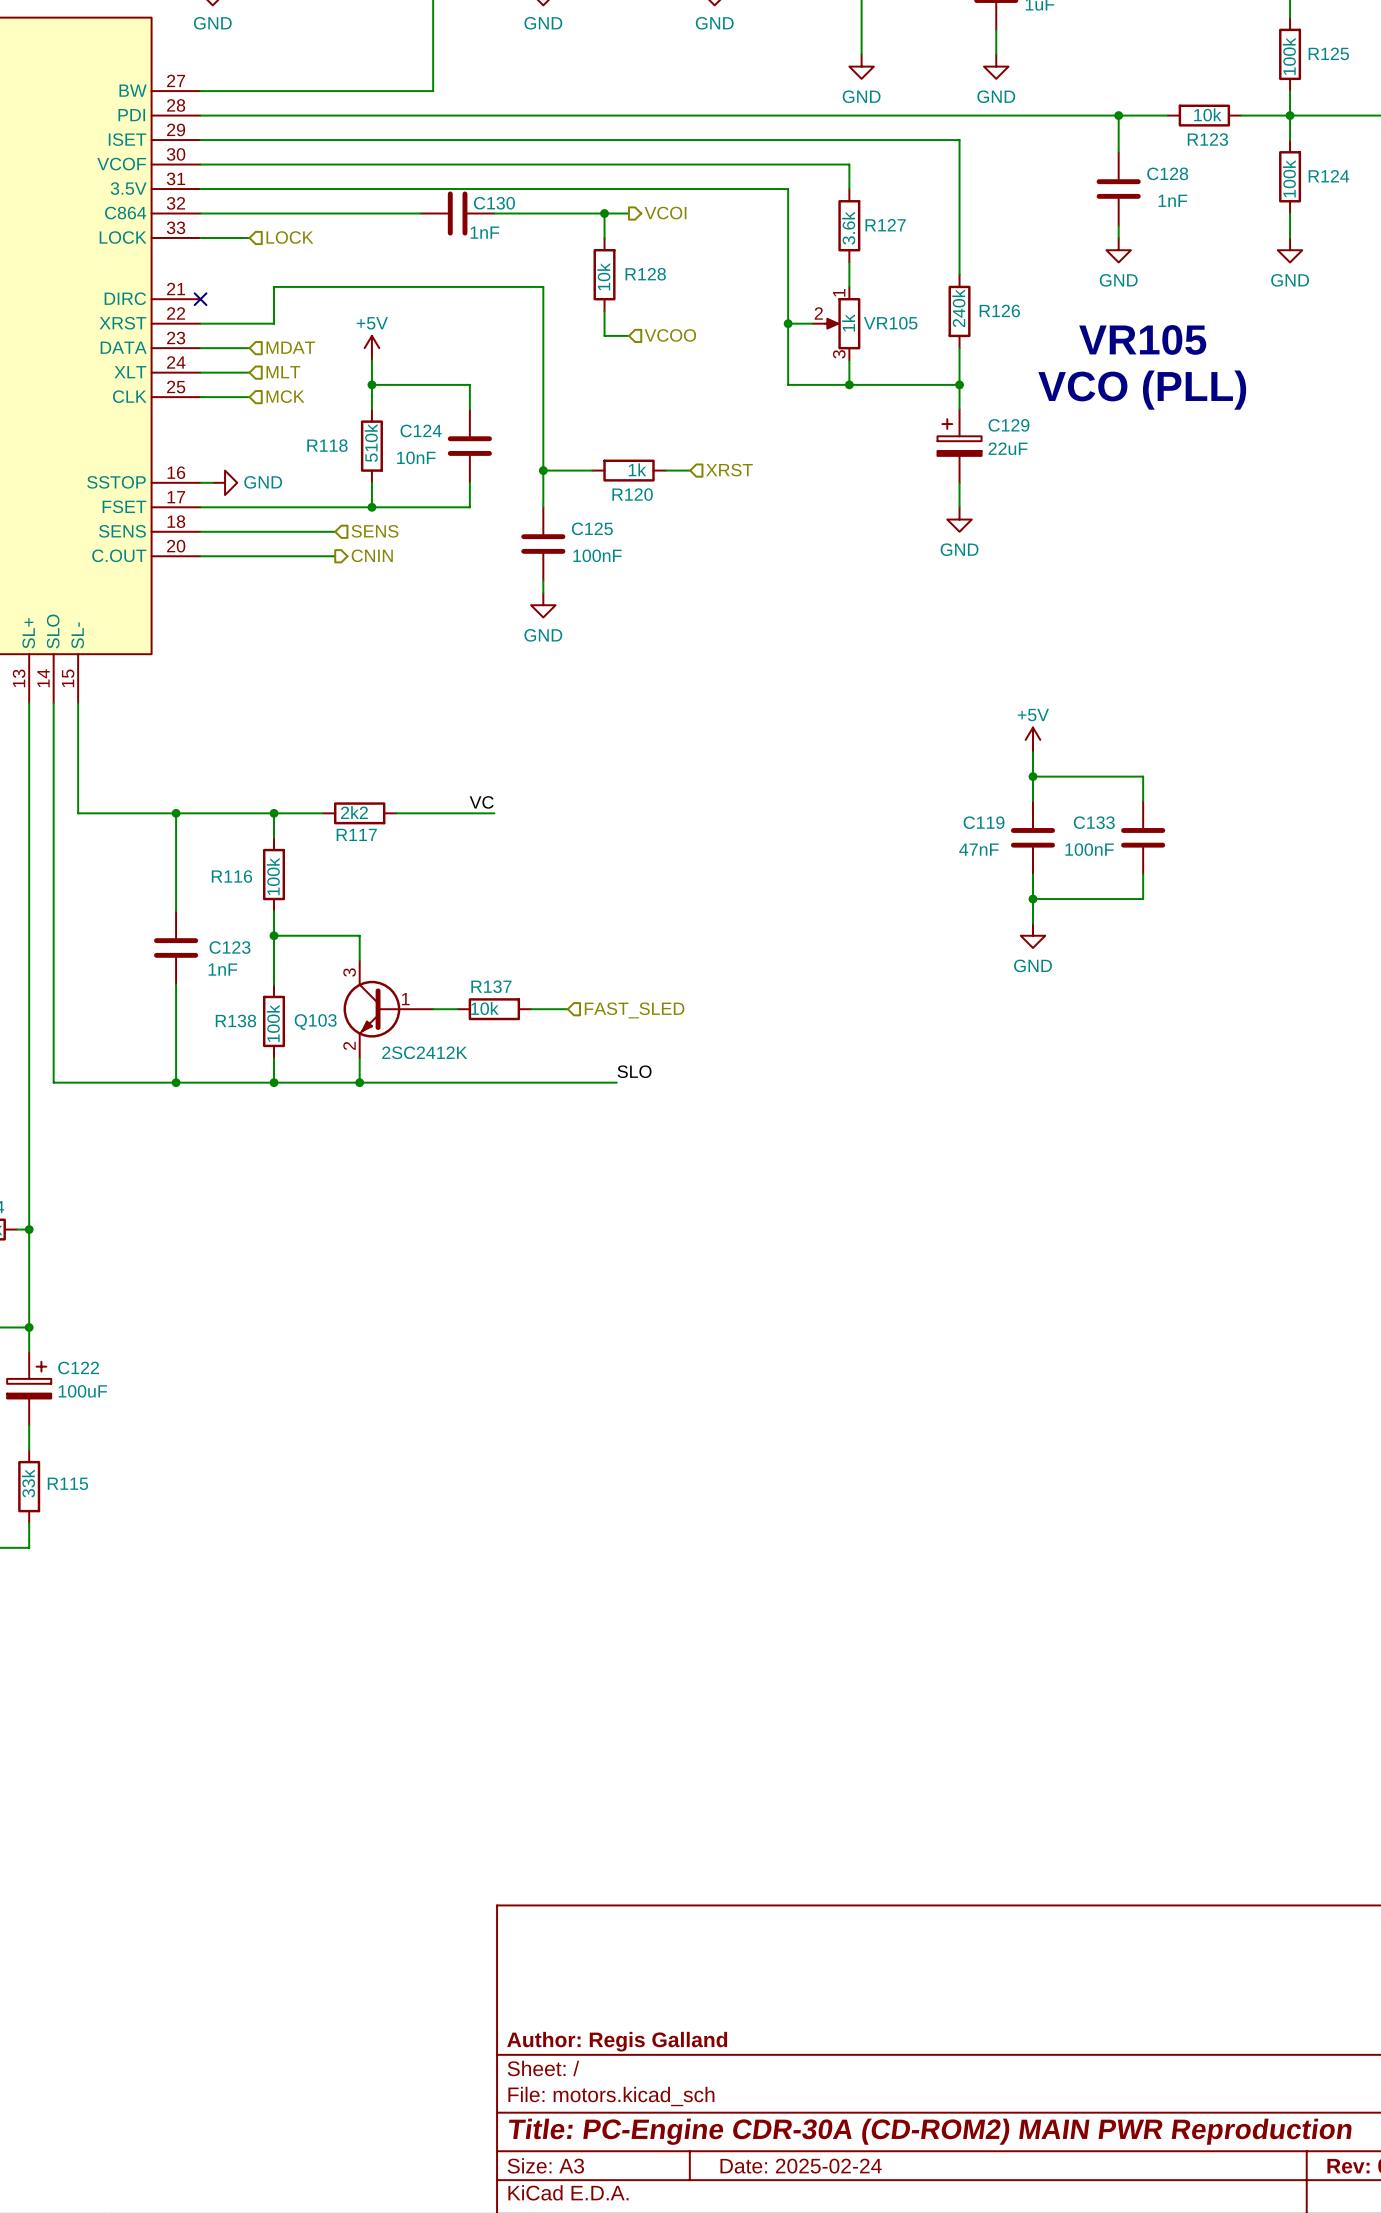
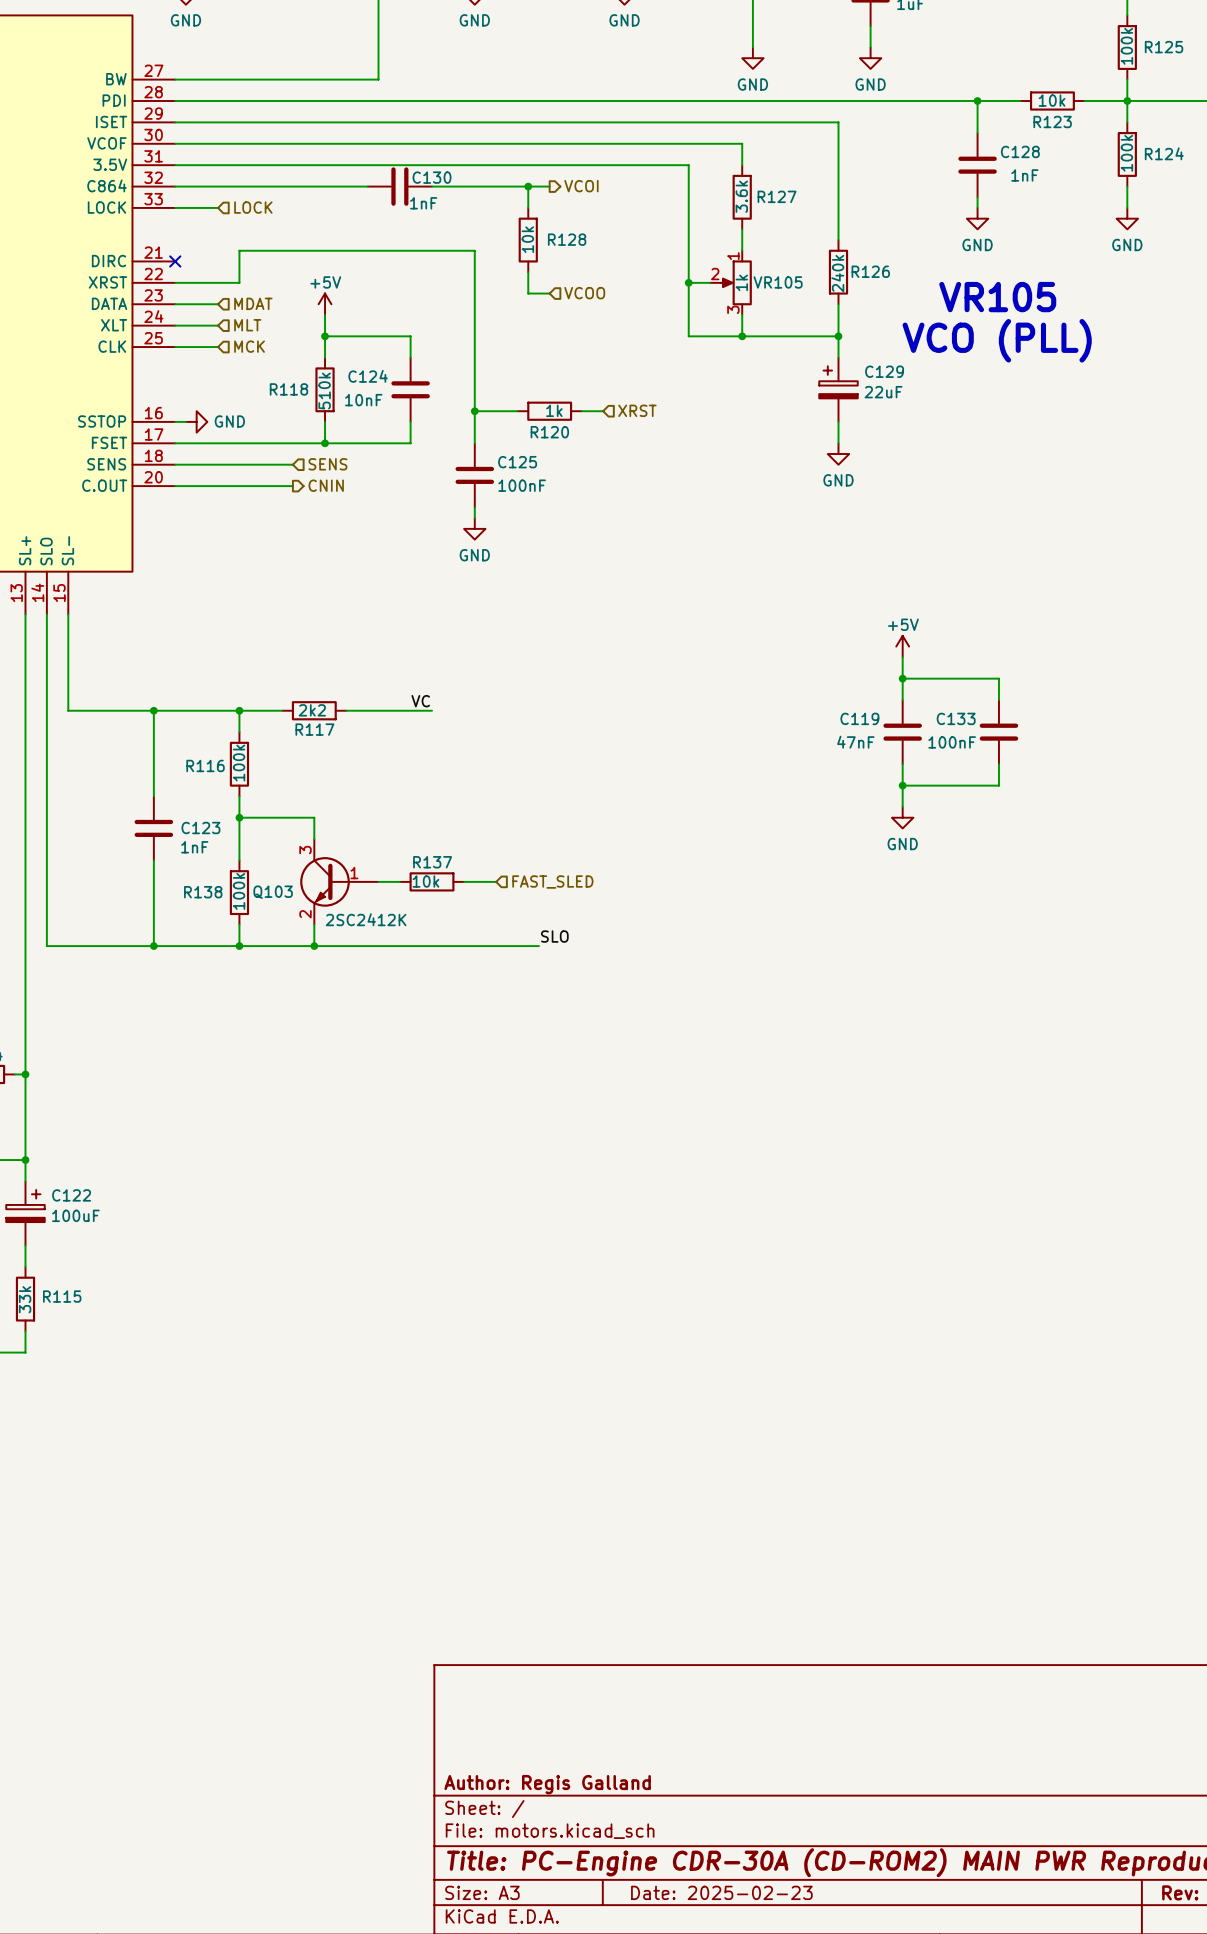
title block: Date: 2025-02-24 (801, 2166) -> Date: 2025-02-23 (721, 1892)

